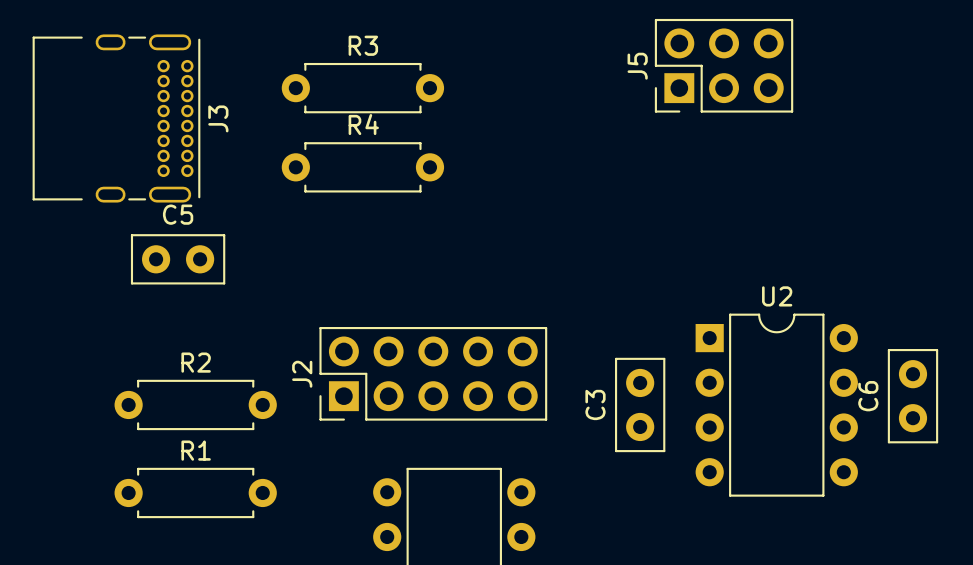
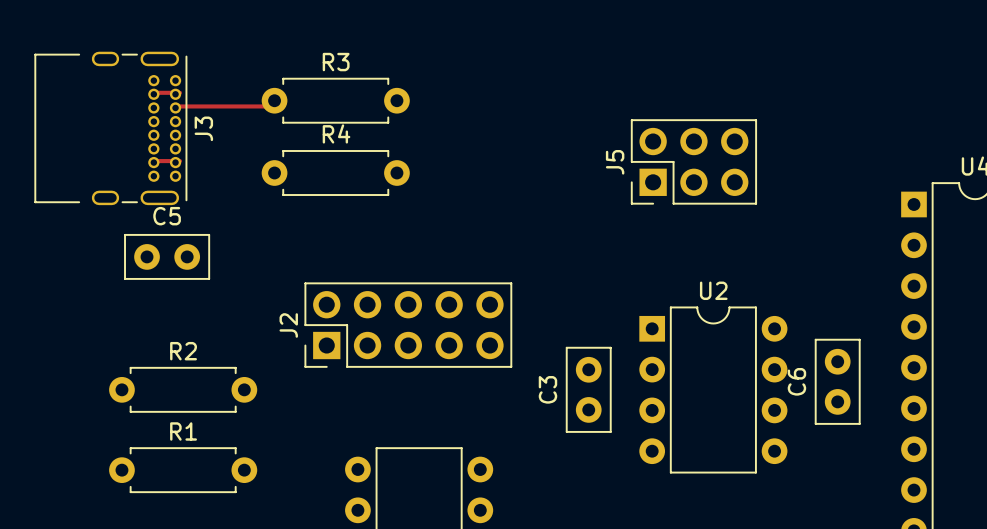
J5 position: (724, 65) -> (693, 161)
track: none -> (158, 92) (179, 92)
track: none -> (274, 100) (268, 106) (179, 106)
track: none -> (158, 161) (179, 161)
J2 position: (433, 373) -> (408, 325)

